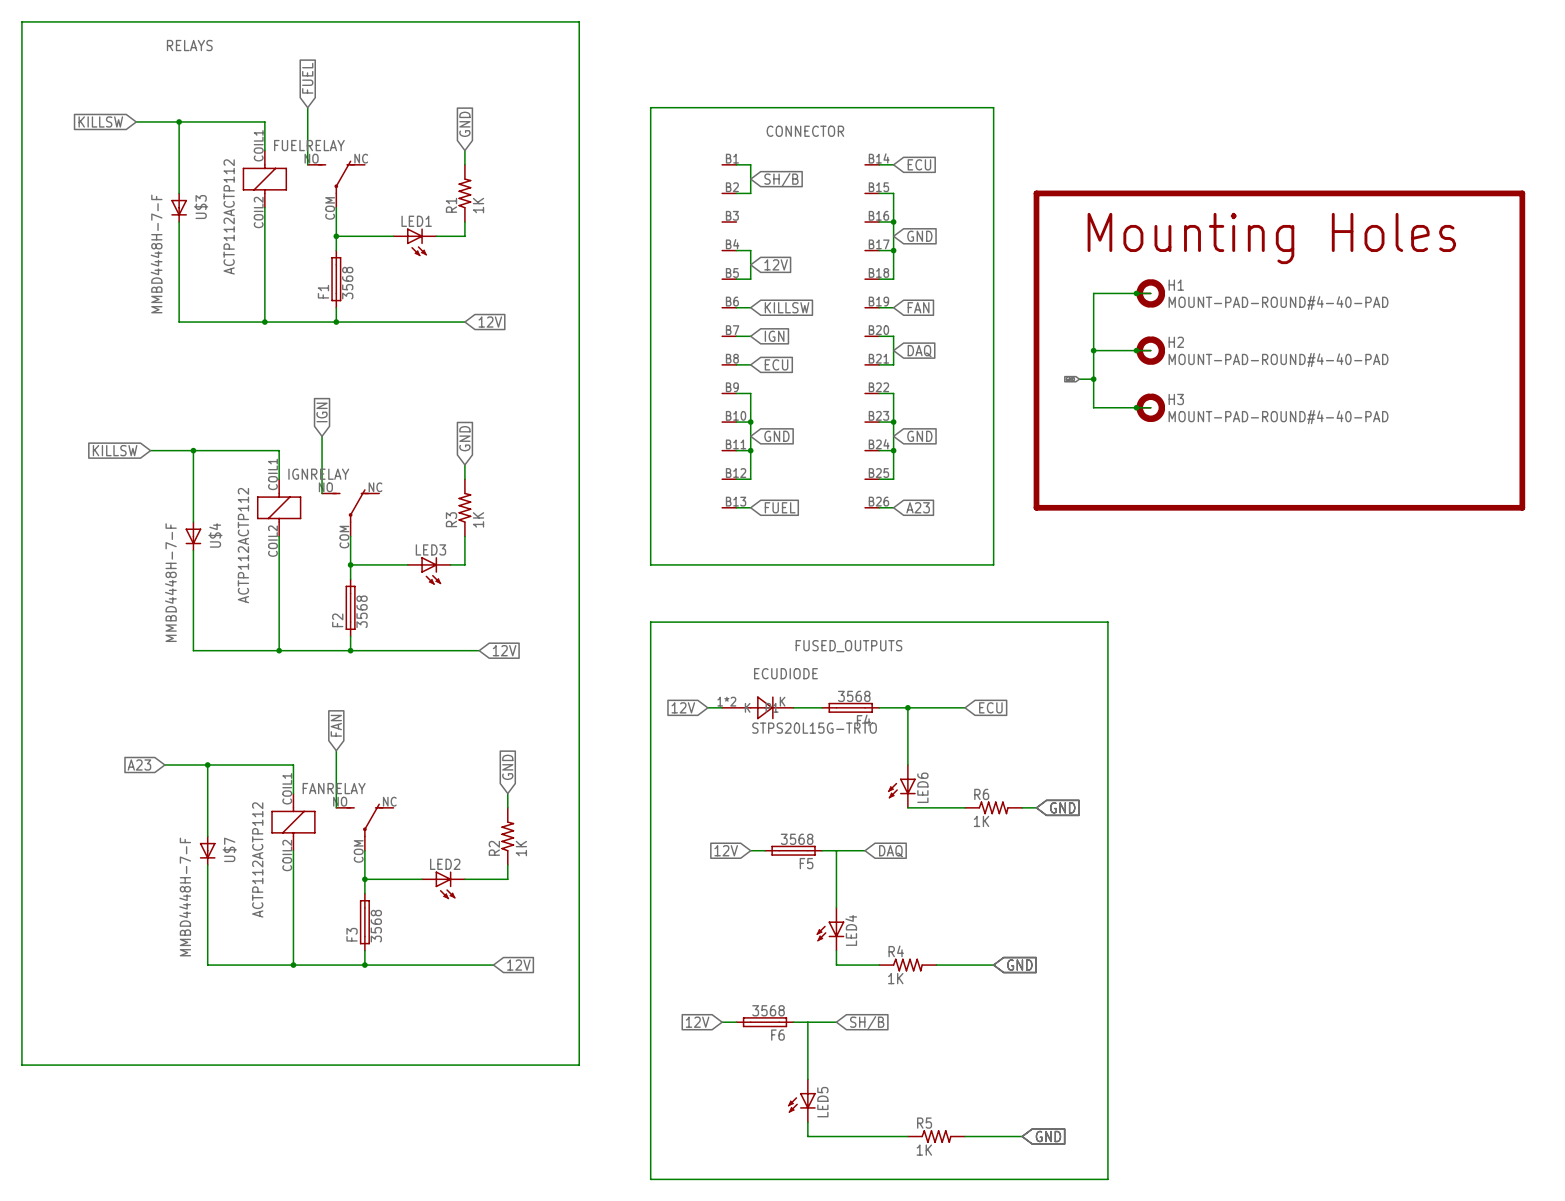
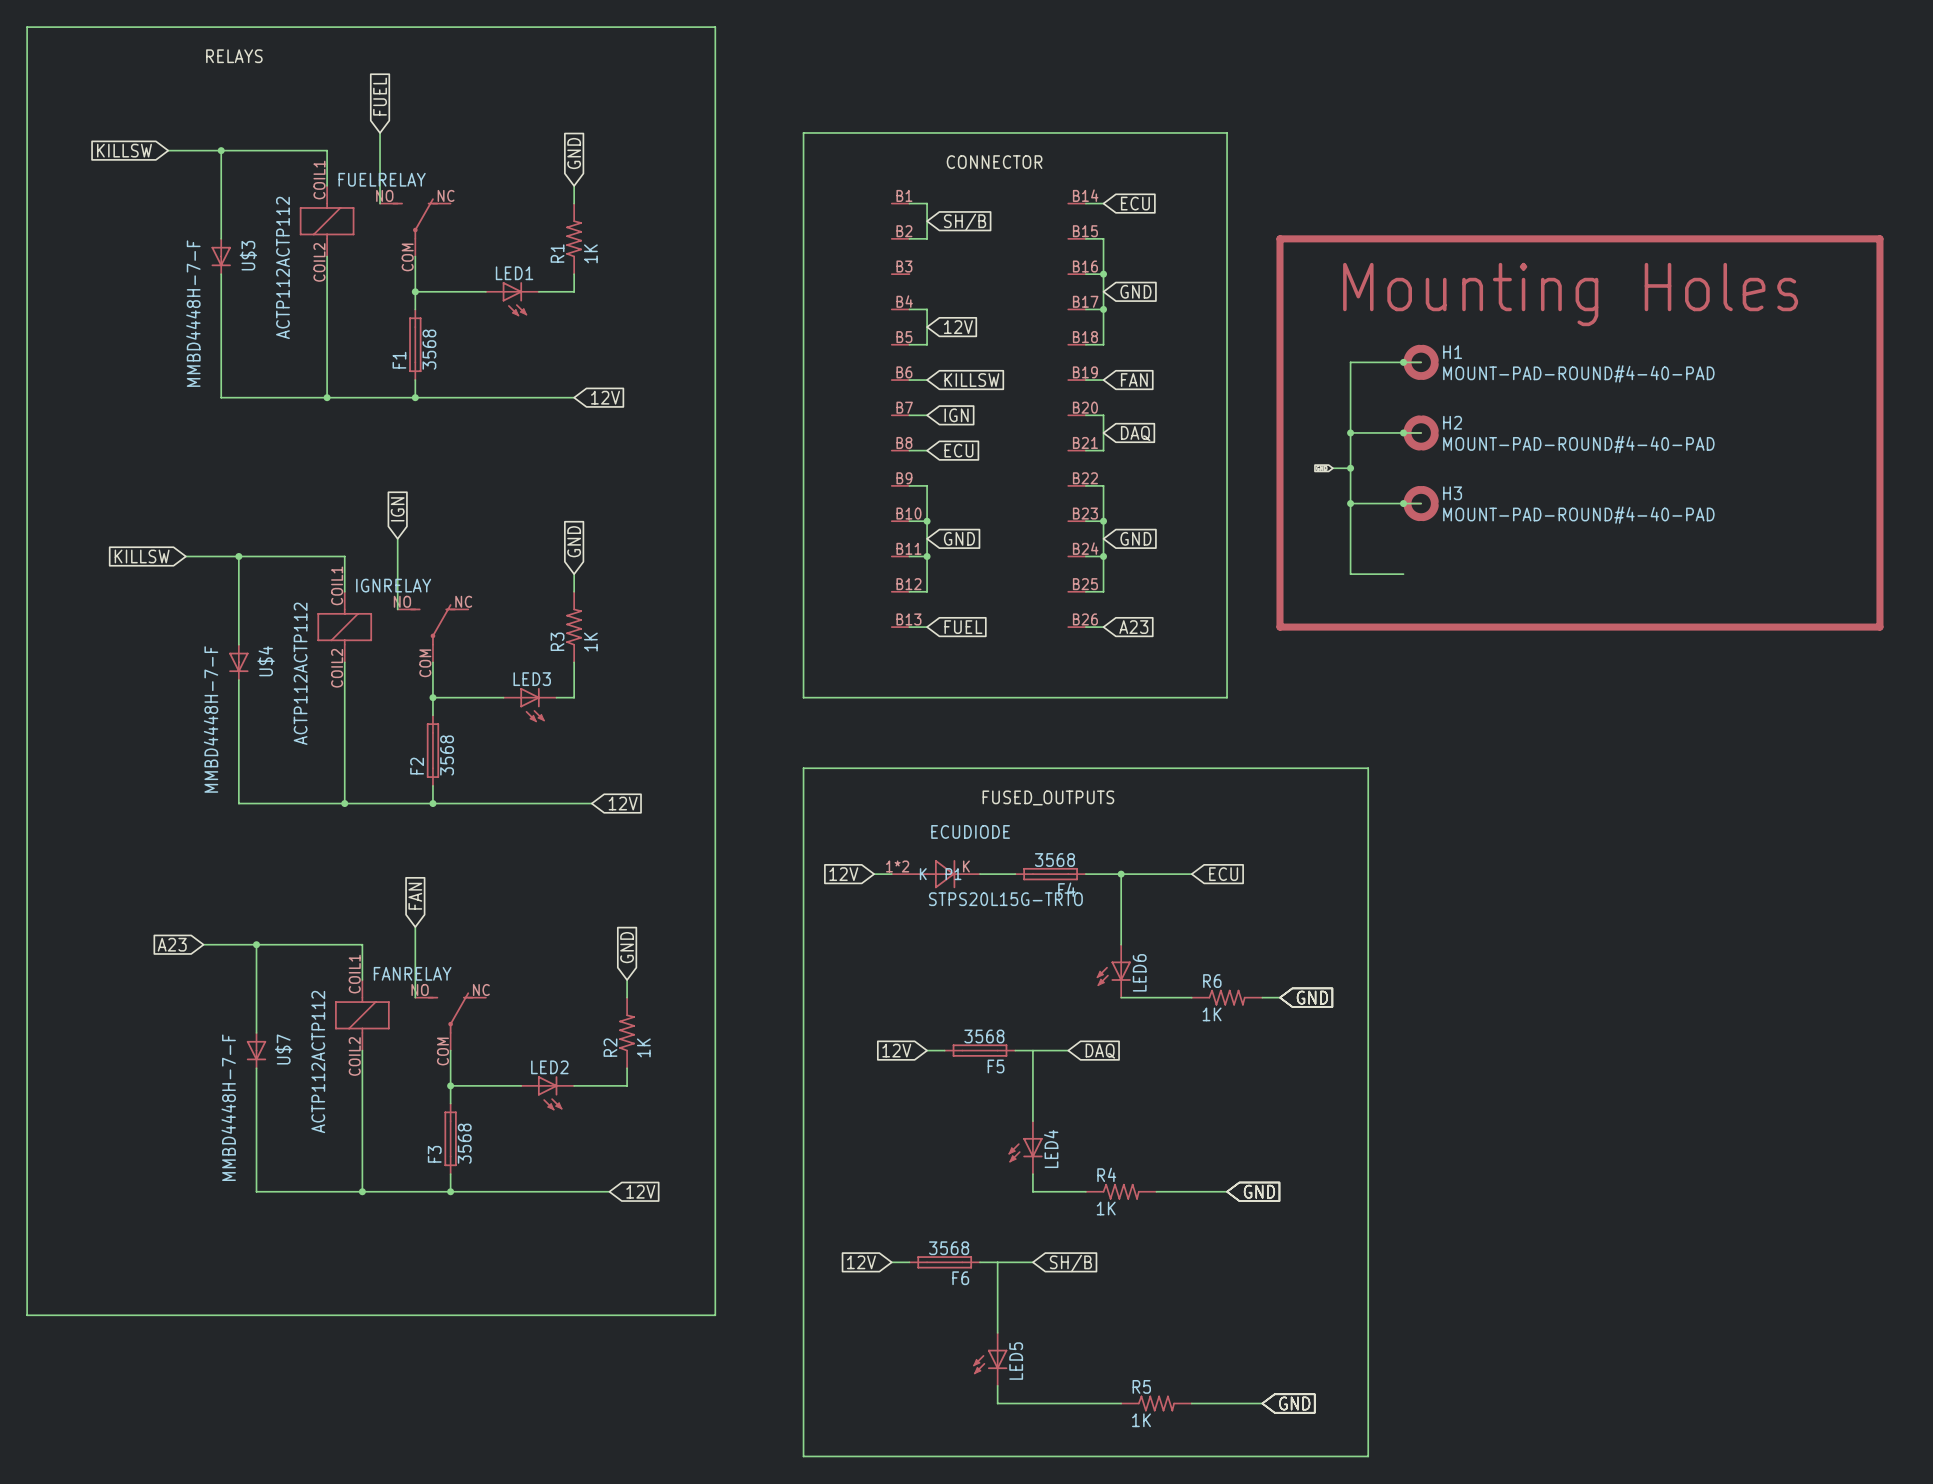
wire: none -> (1350, 503) (1350, 574) (1403, 574)
junction: none -> (1350, 503)

